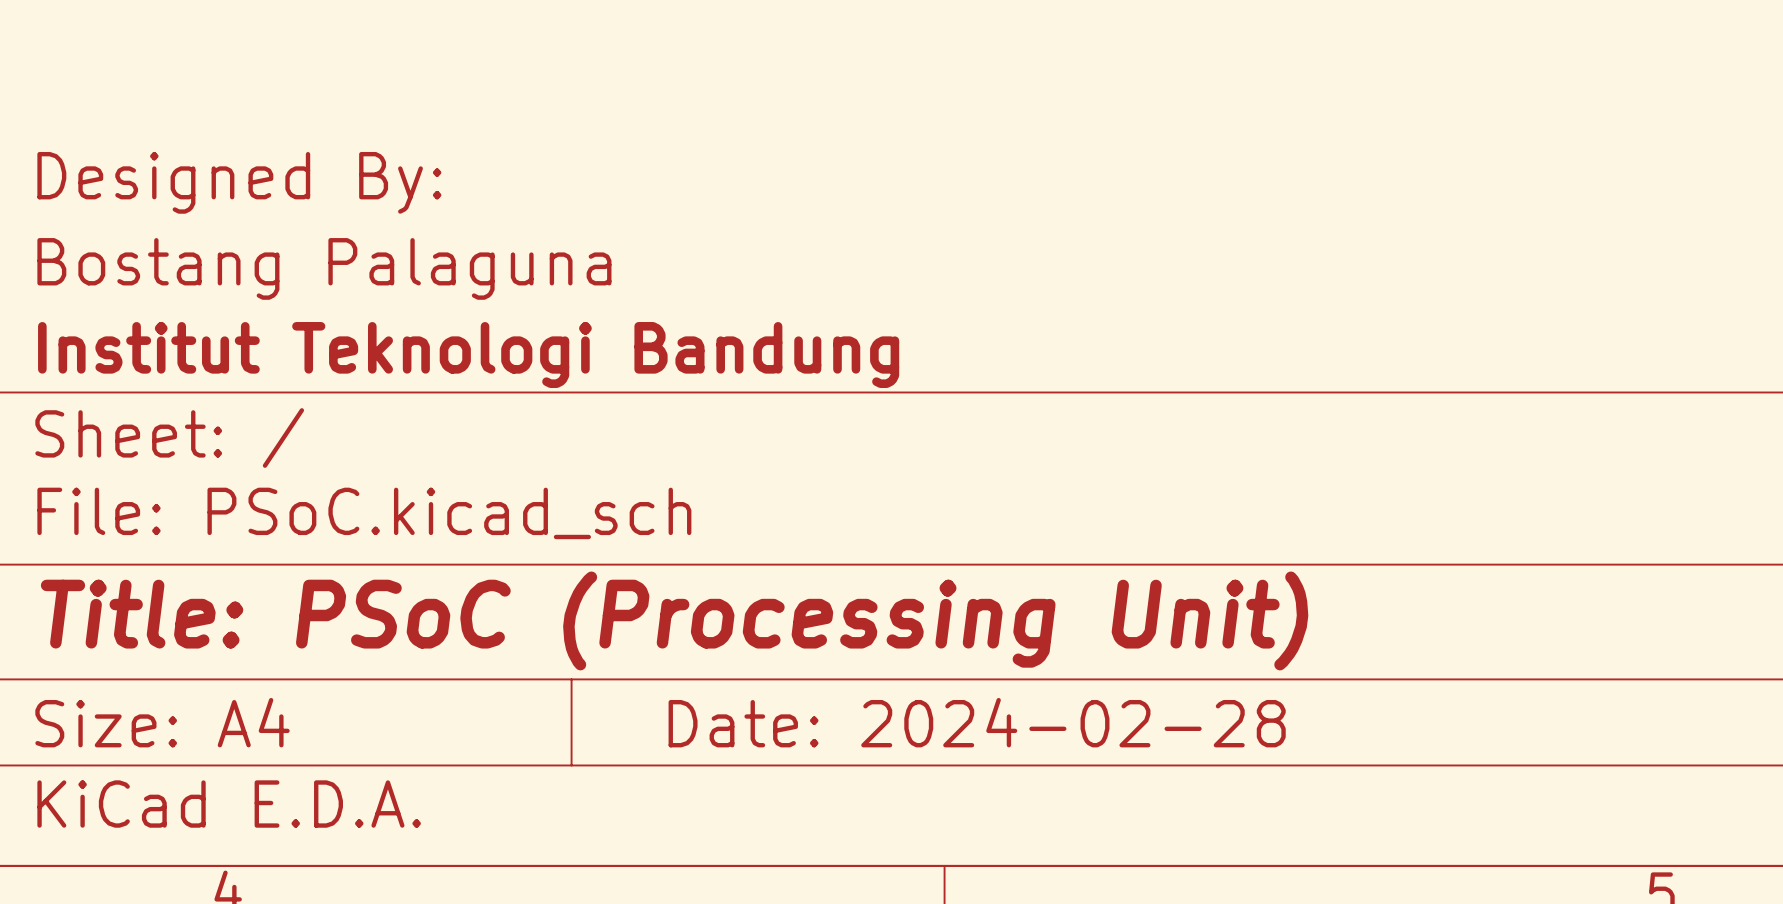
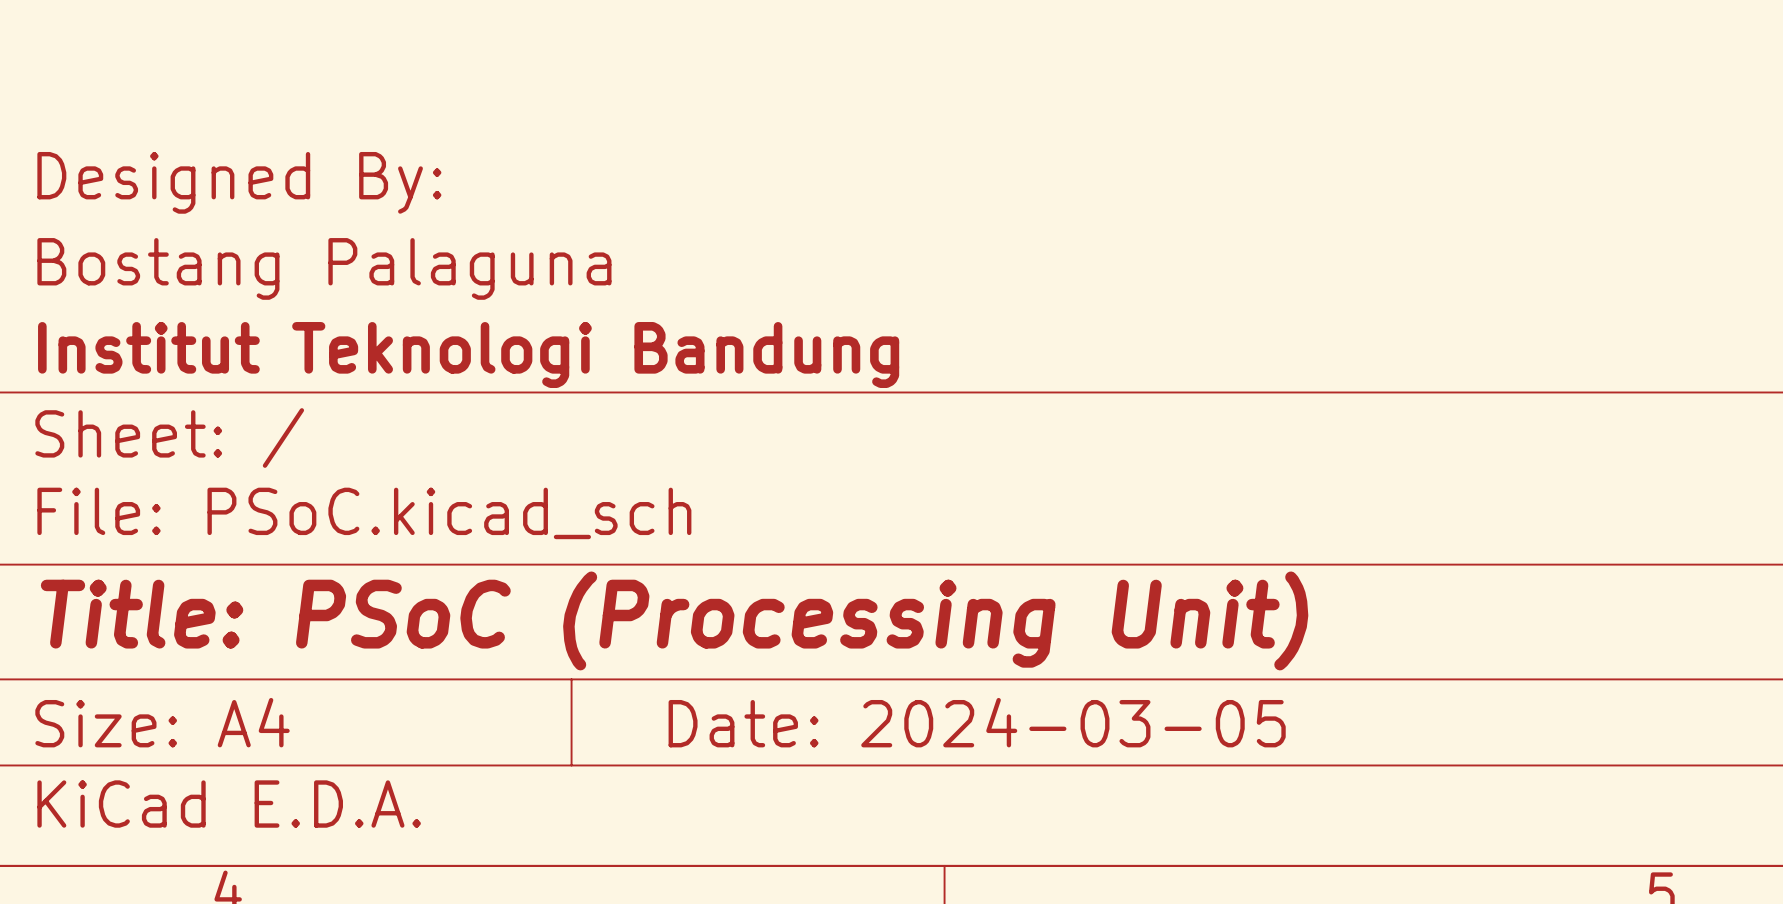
title block: Date: 2024-02-28 (977, 722) -> Date: 2024-03-05 (977, 722)

